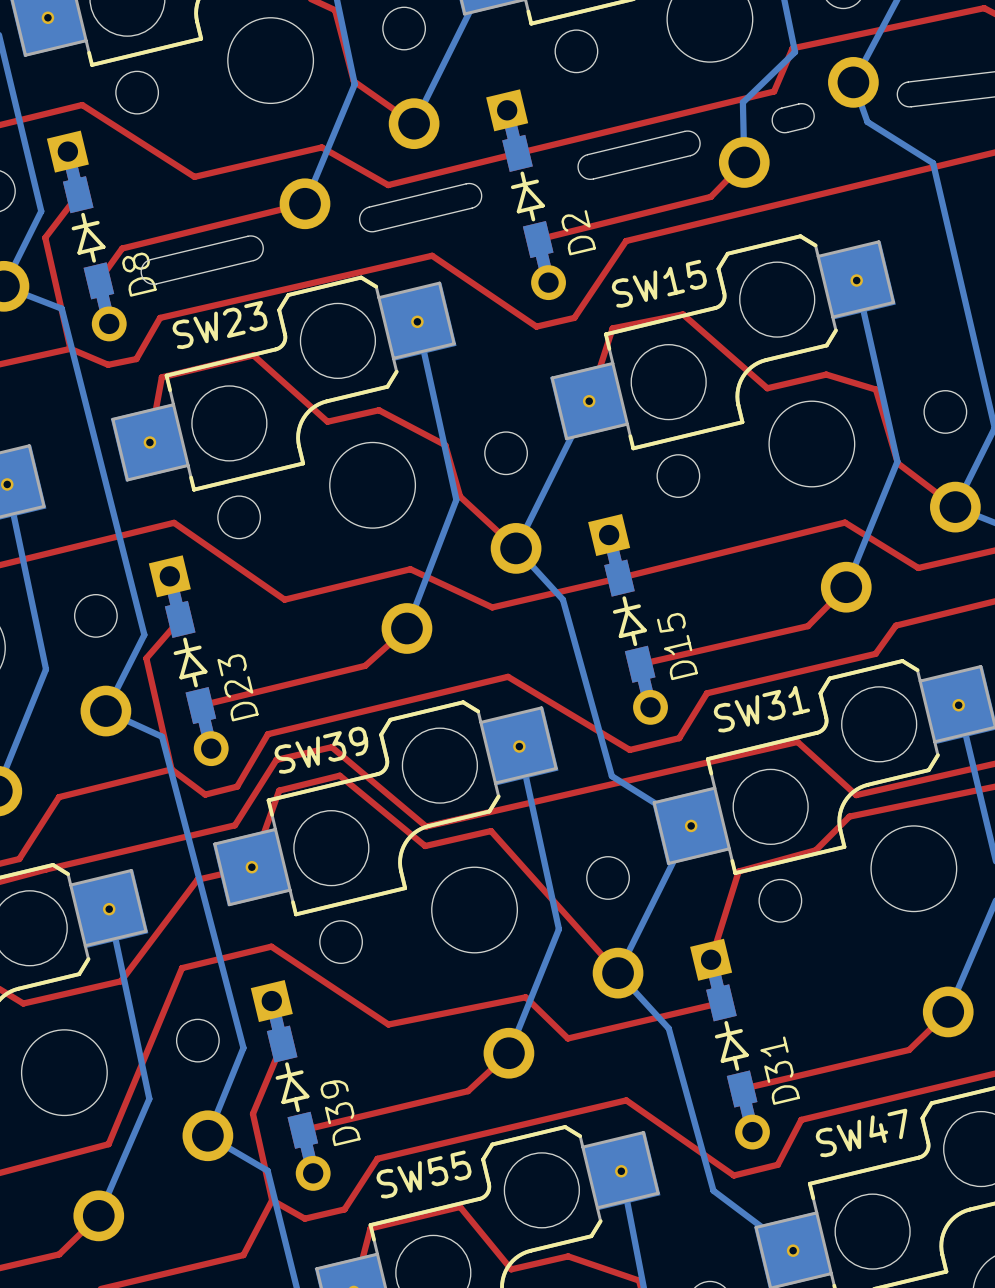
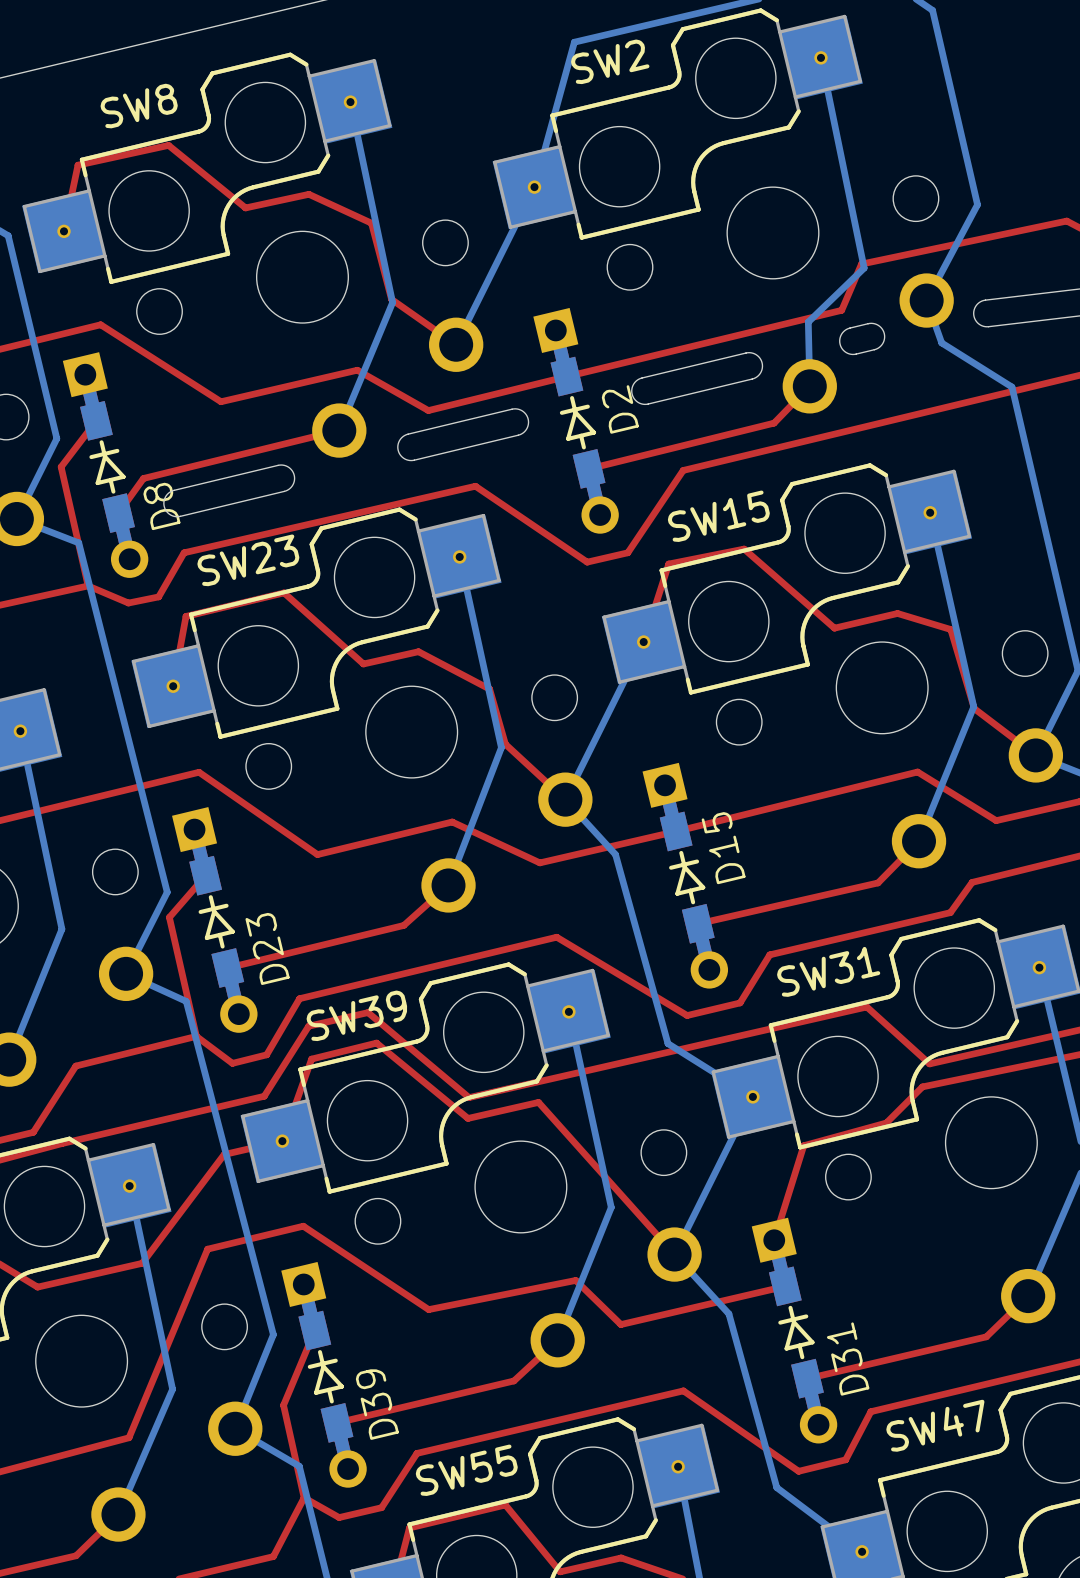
D2 name position: D2 (578, 232) -> D2 (620, 409)
D15 name position: D15 (677, 646) -> D15 (723, 848)

